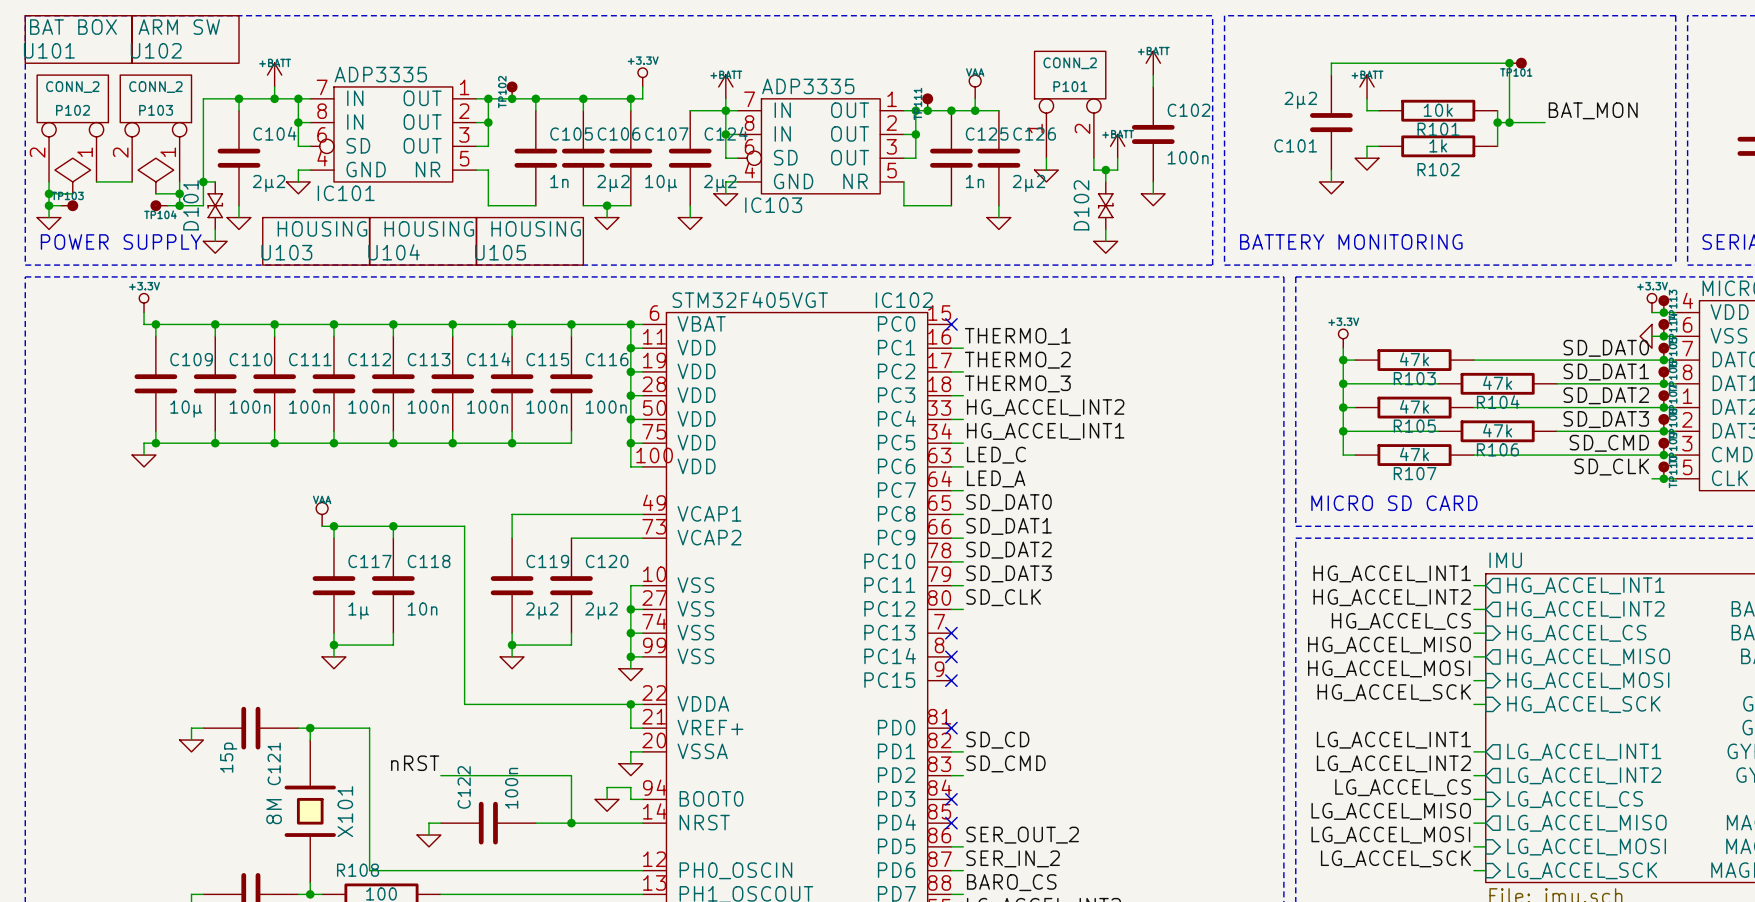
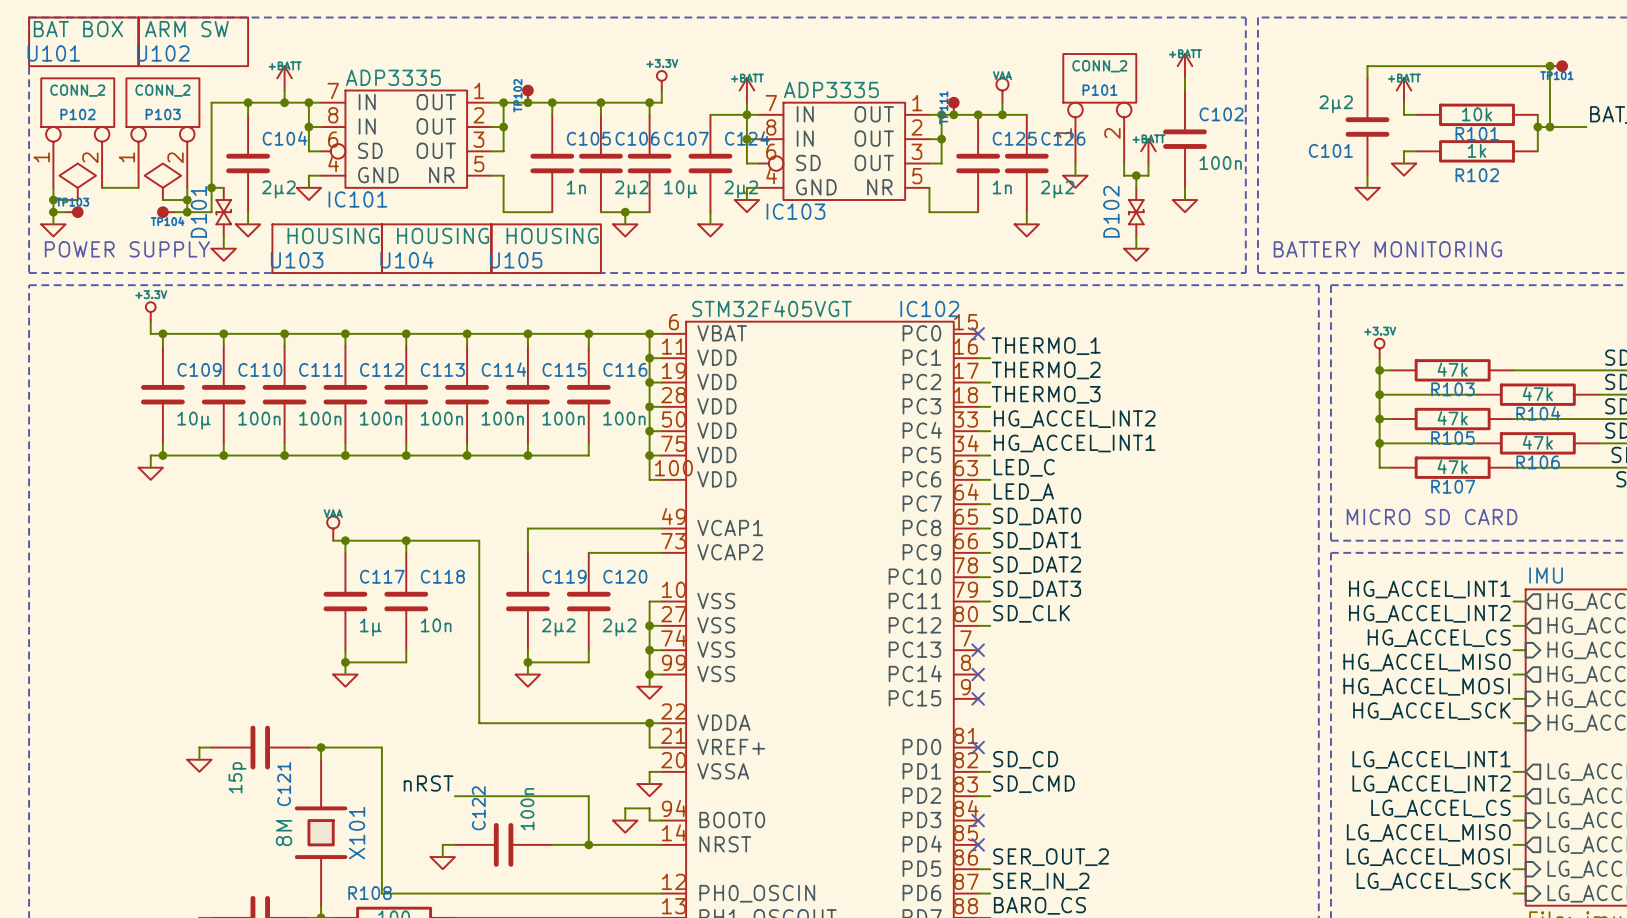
P102 flip: as is (72, 98) -> left-right (77, 102)
P103 flip: as is (155, 98) -> left-right (162, 102)

